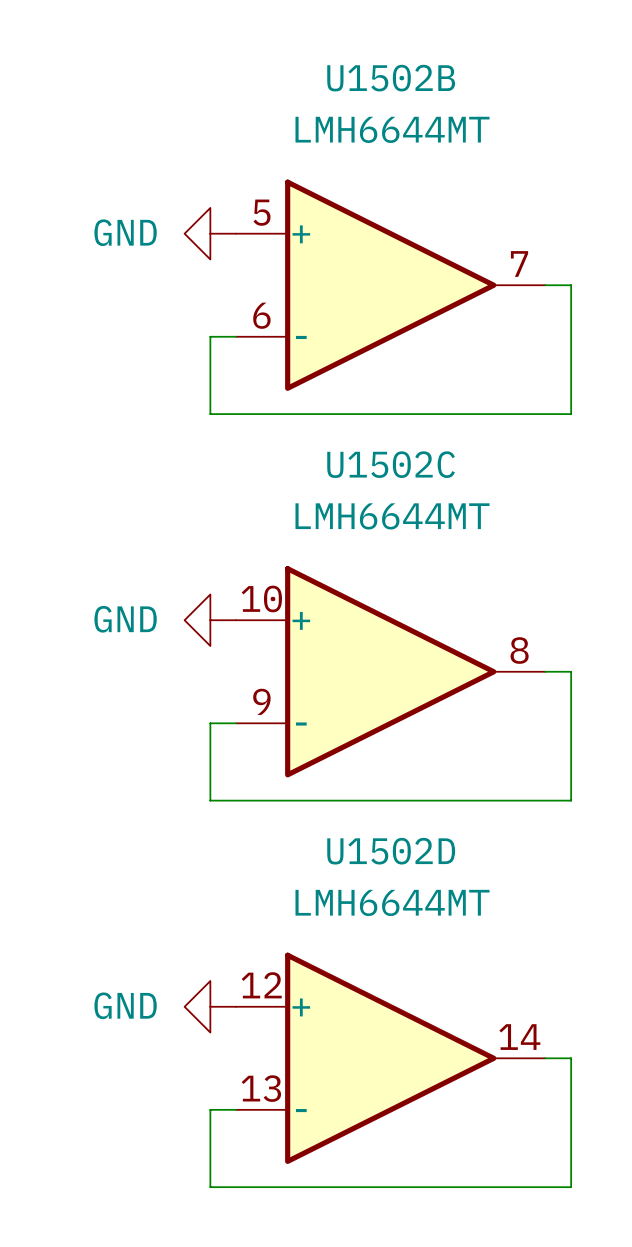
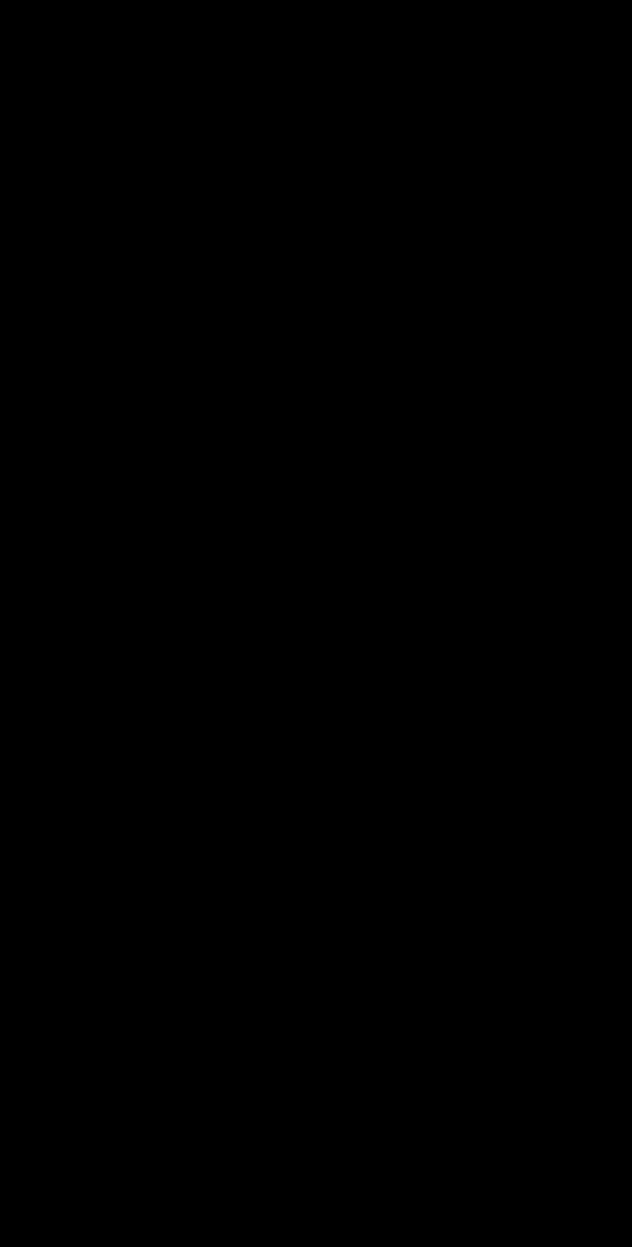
power symbol: GND (210, 233) -> none
U1502B: LMH6644MT (390, 285) -> none
wire: (545, 285) (571, 285) (571, 414) (210, 414) (210, 336) (236, 336) -> none
power symbol: GND (210, 620) -> none
U1502C: LMH6644MT (390, 671) -> none
wire: (545, 671) (571, 671) (571, 800) (210, 800) (210, 723) (236, 723) -> none
power symbol: GND (210, 1006) -> none
U1502D: LMH6644MT (390, 1058) -> none
wire: (545, 1058) (571, 1058) (571, 1187) (210, 1187) (210, 1109) (236, 1109) -> none

